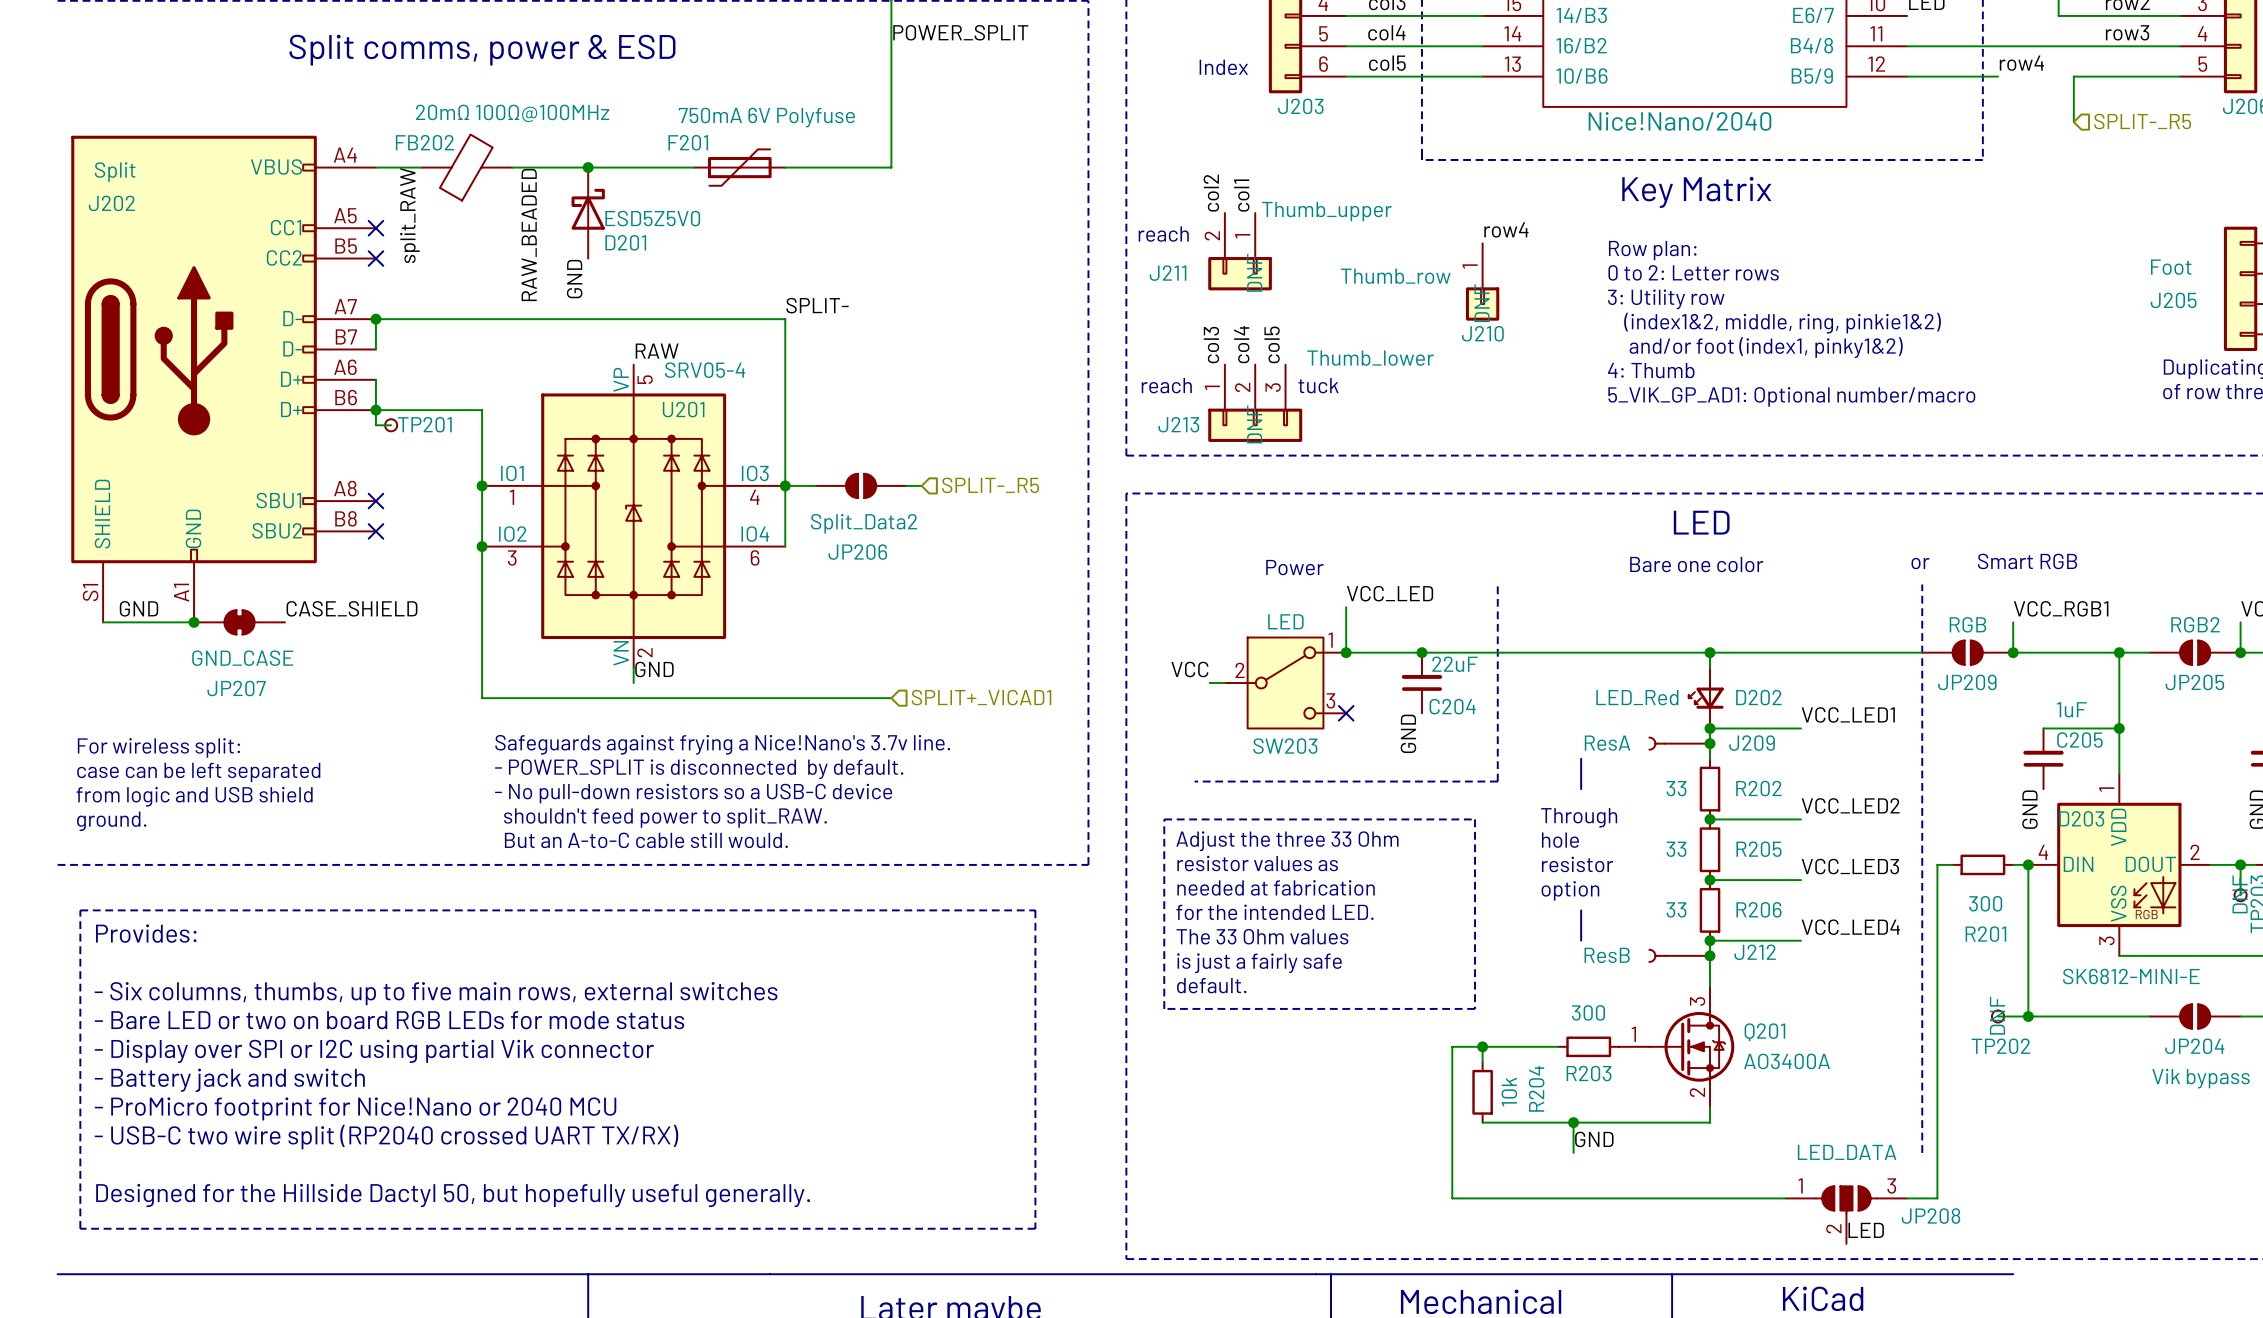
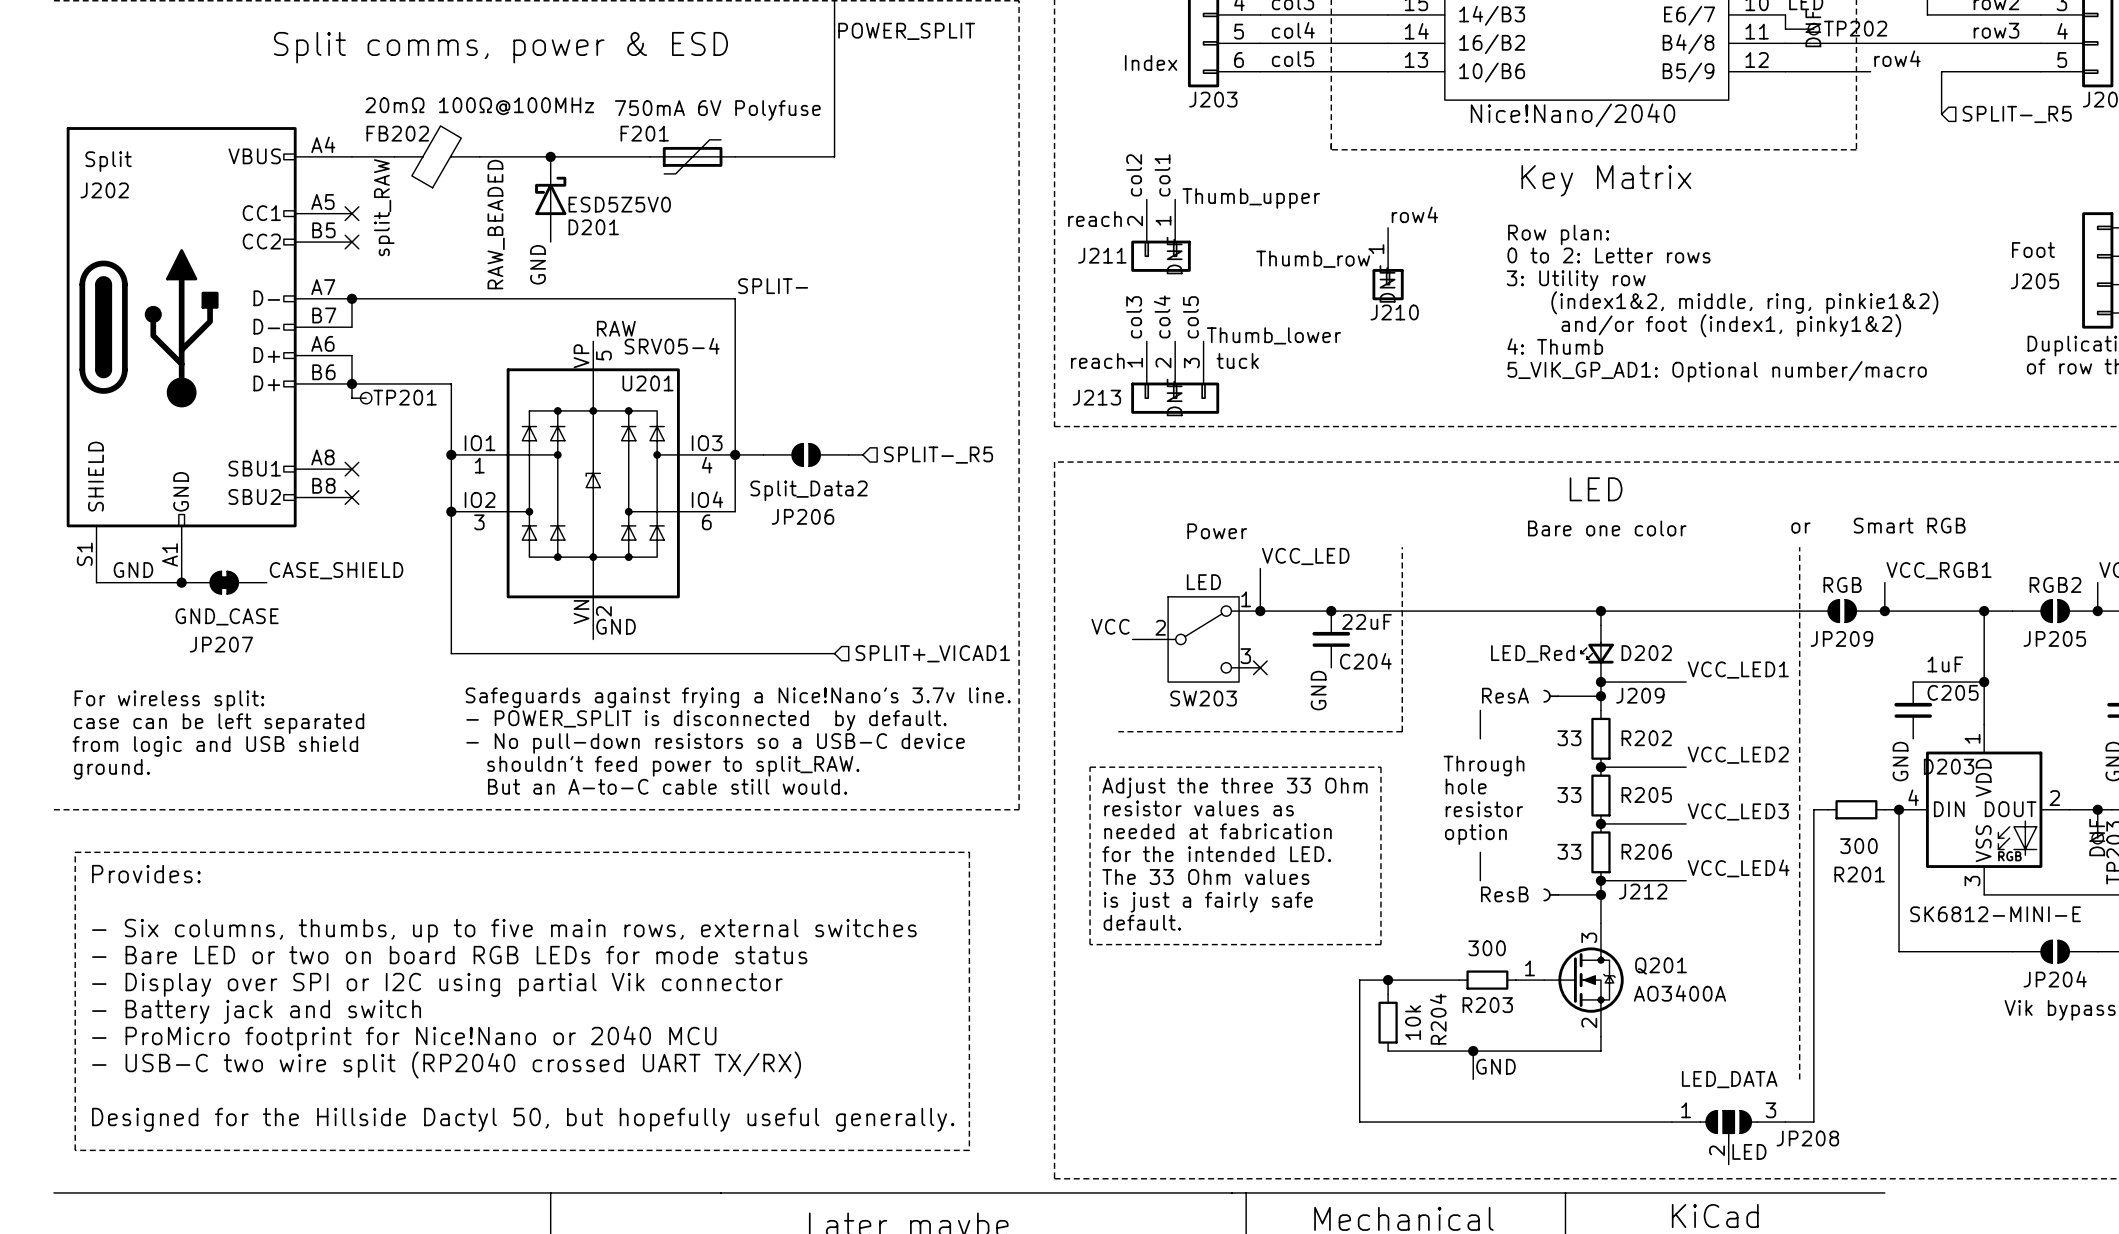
wire: none -> (1785, 14) (1785, 29) (1813, 29)
wire: (1998, 1016) (2028, 1016) -> none
TP202 position: (1998, 1016) -> (1813, 29)
junction: (2028, 1016) -> none
TP202 name position: TP202 (2000, 1046) -> TP202 (1855, 28)

